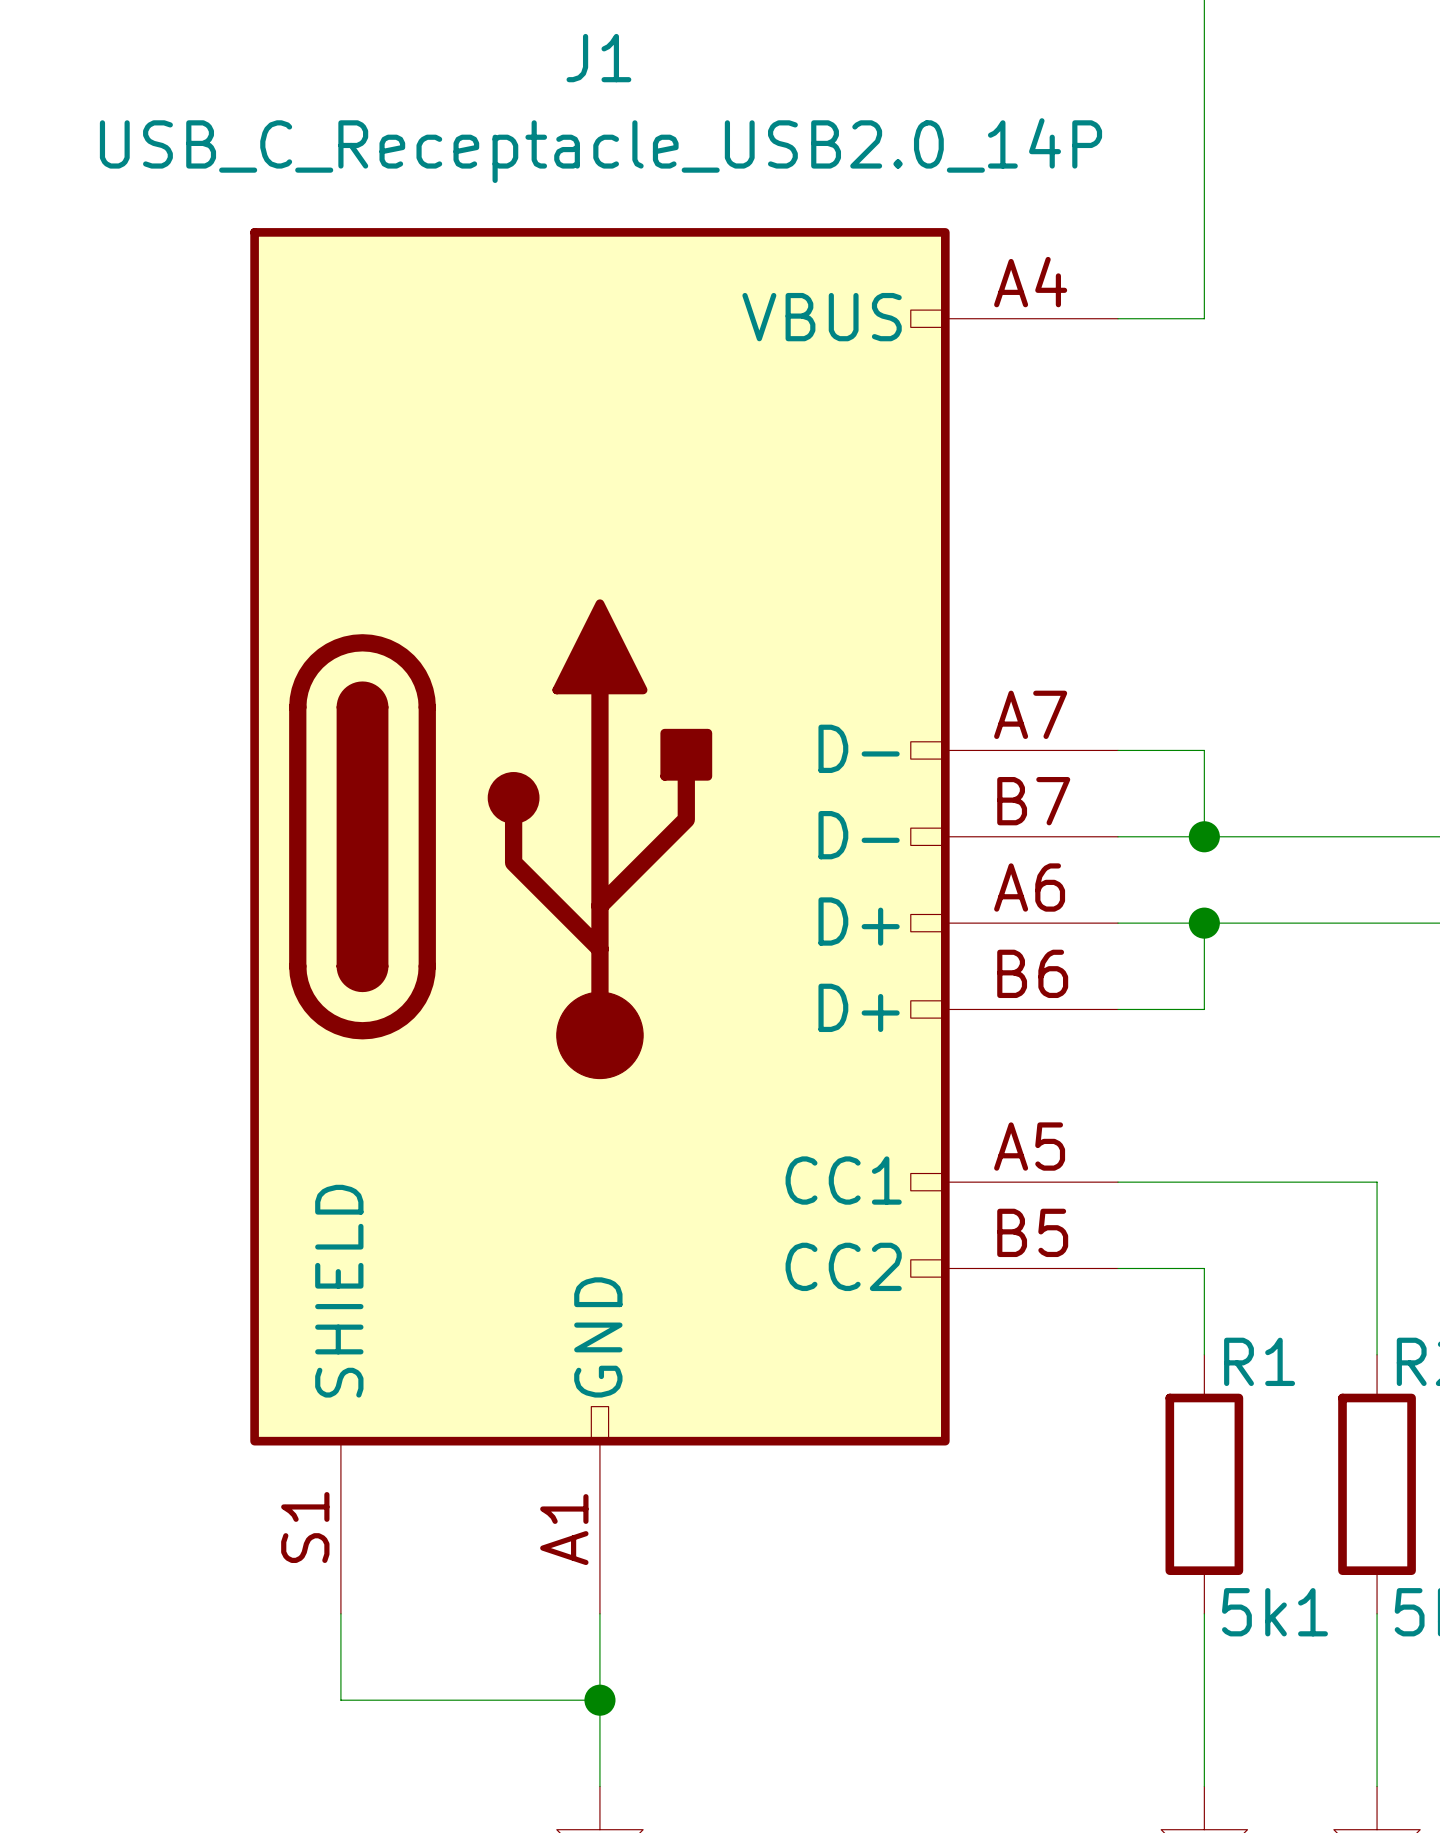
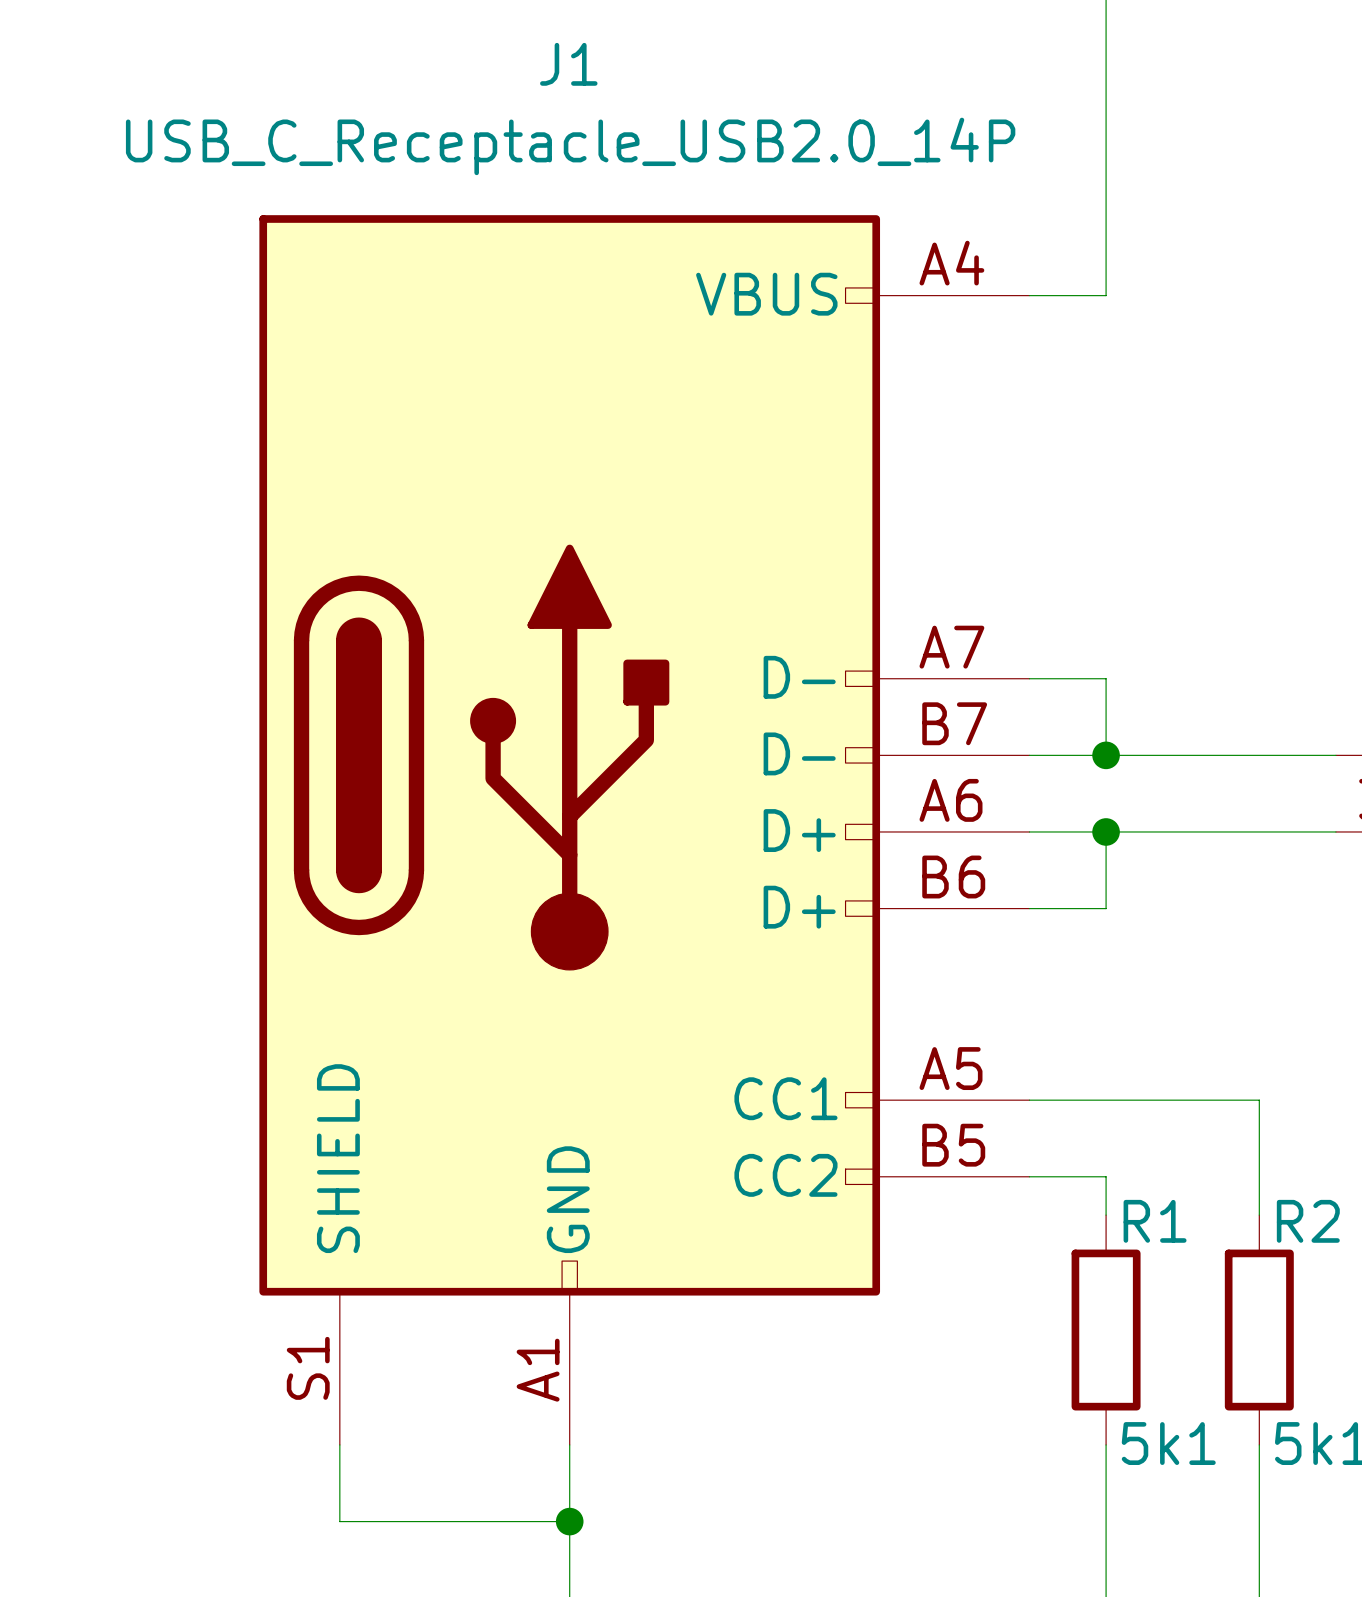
J1 symbol: [250, 228, 1119, 1614] -> [259, 215, 1030, 1445]
wire: (1118, 1182) (1377, 1182) (1377, 1225) -> (1029, 1100) (1259, 1100)
wire: (1118, 1268) (1204, 1268) (1204, 1311) -> (1029, 1176) (1106, 1176)

